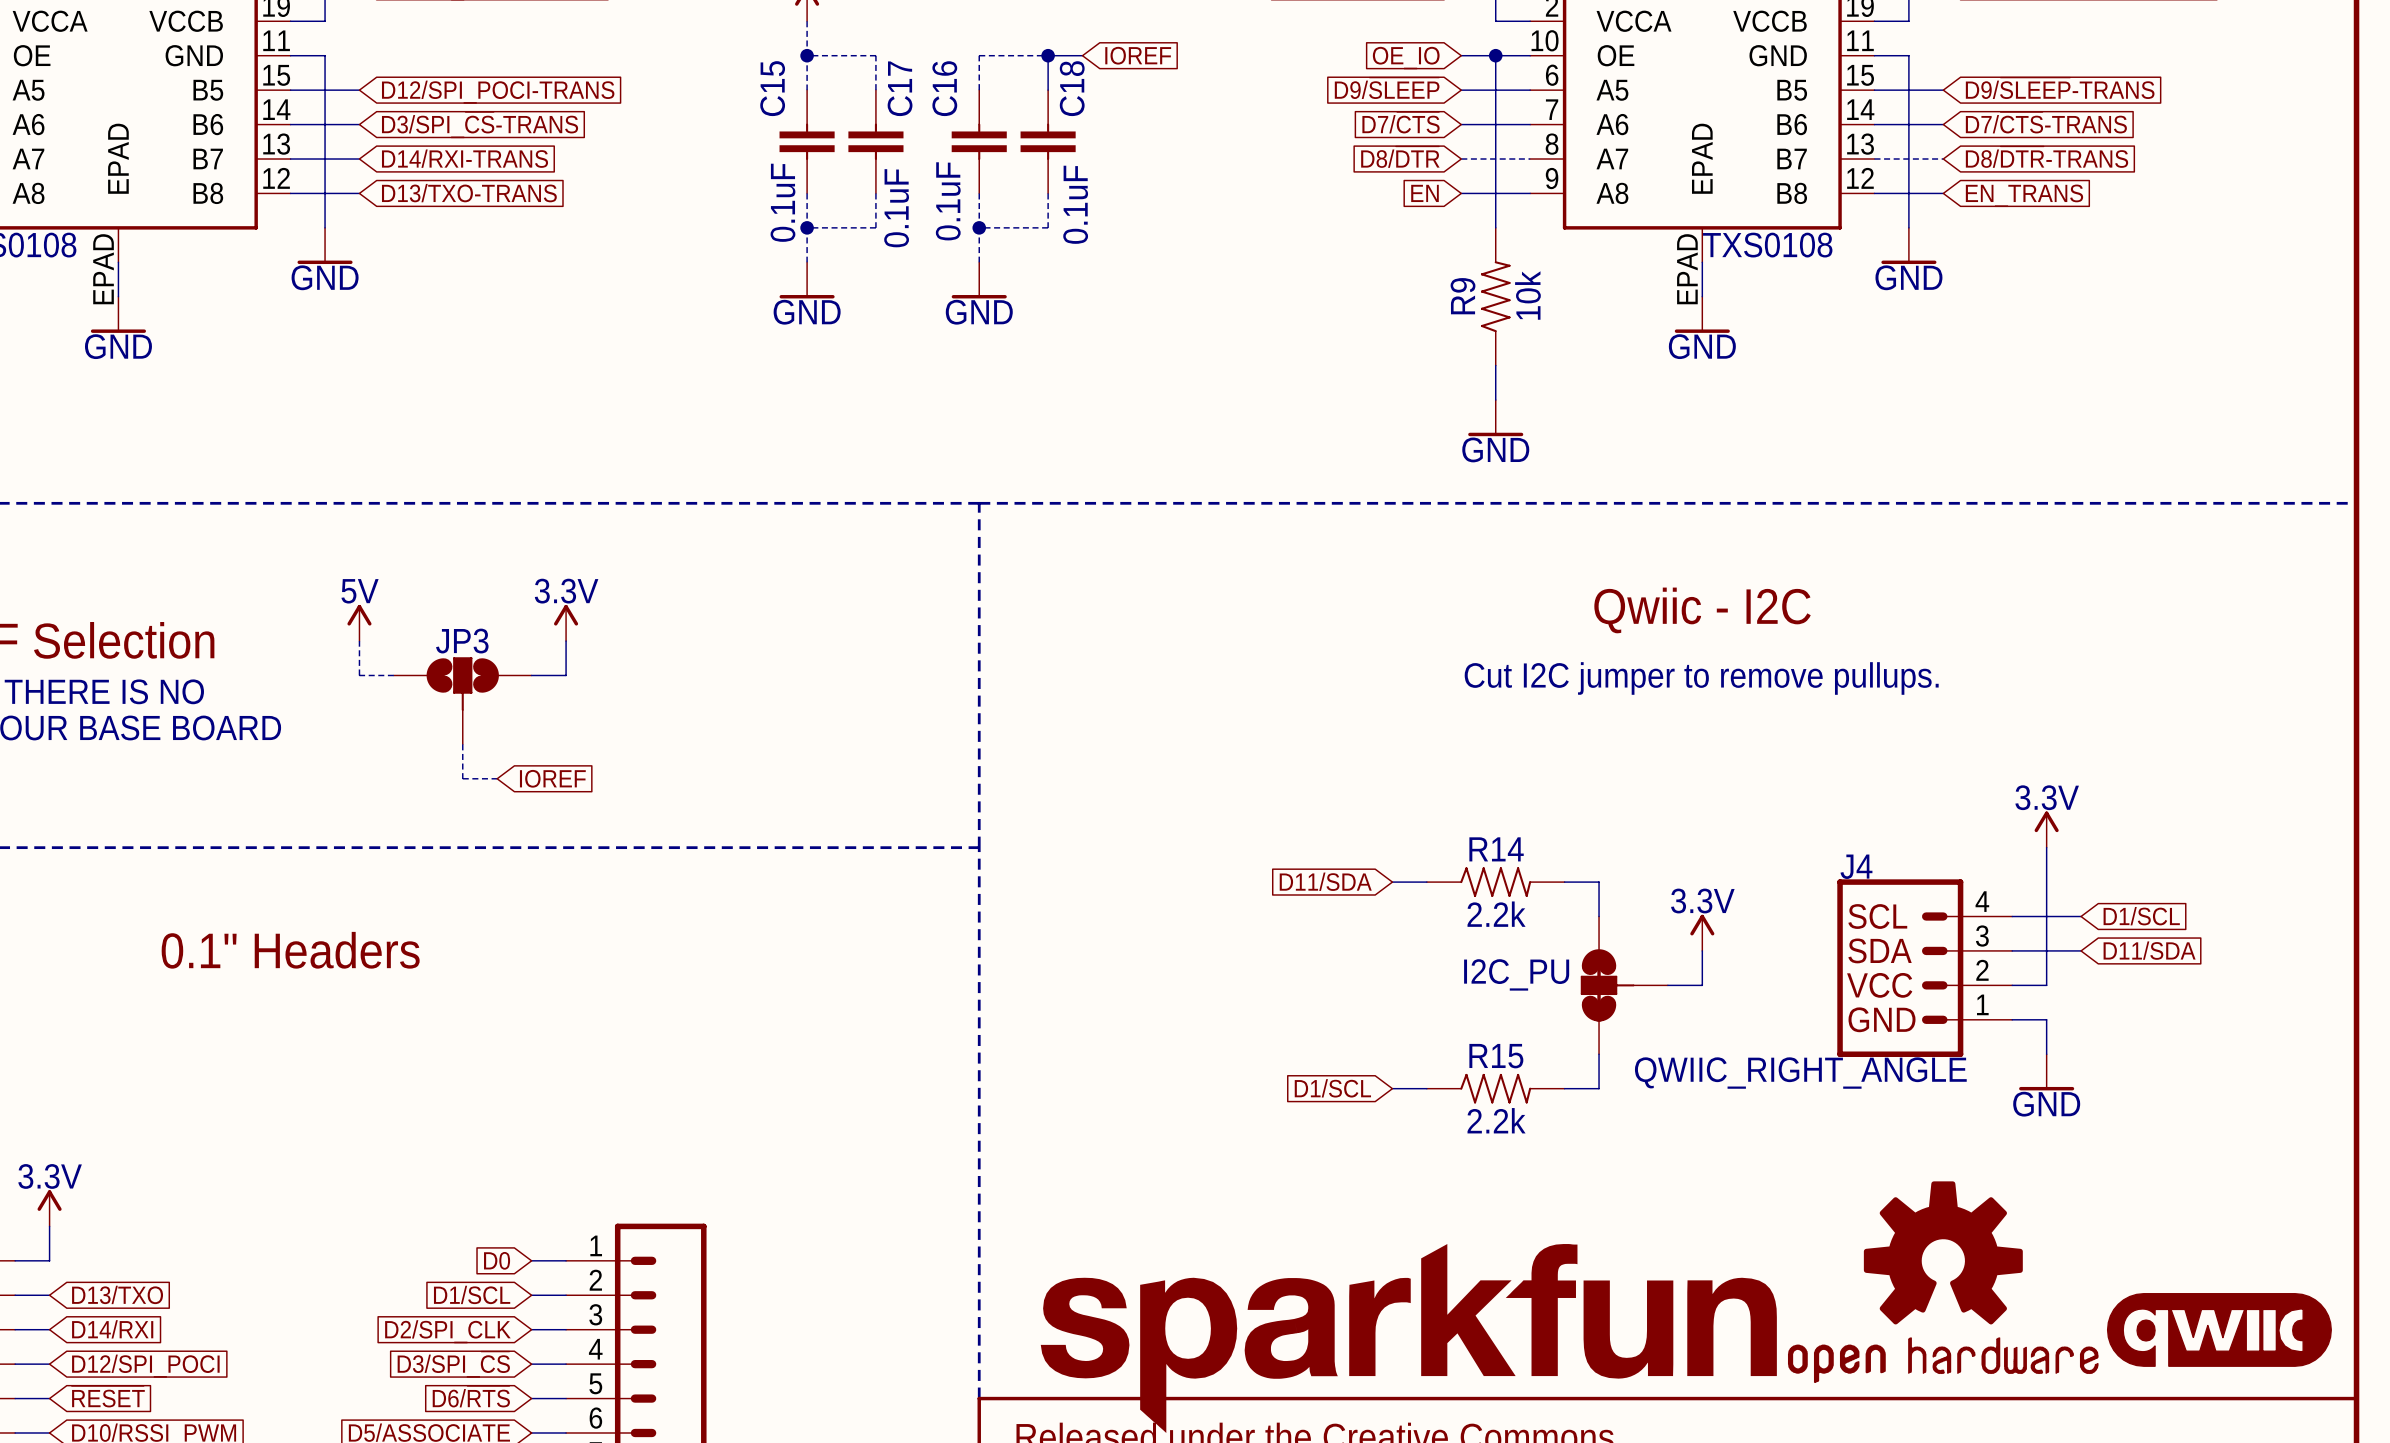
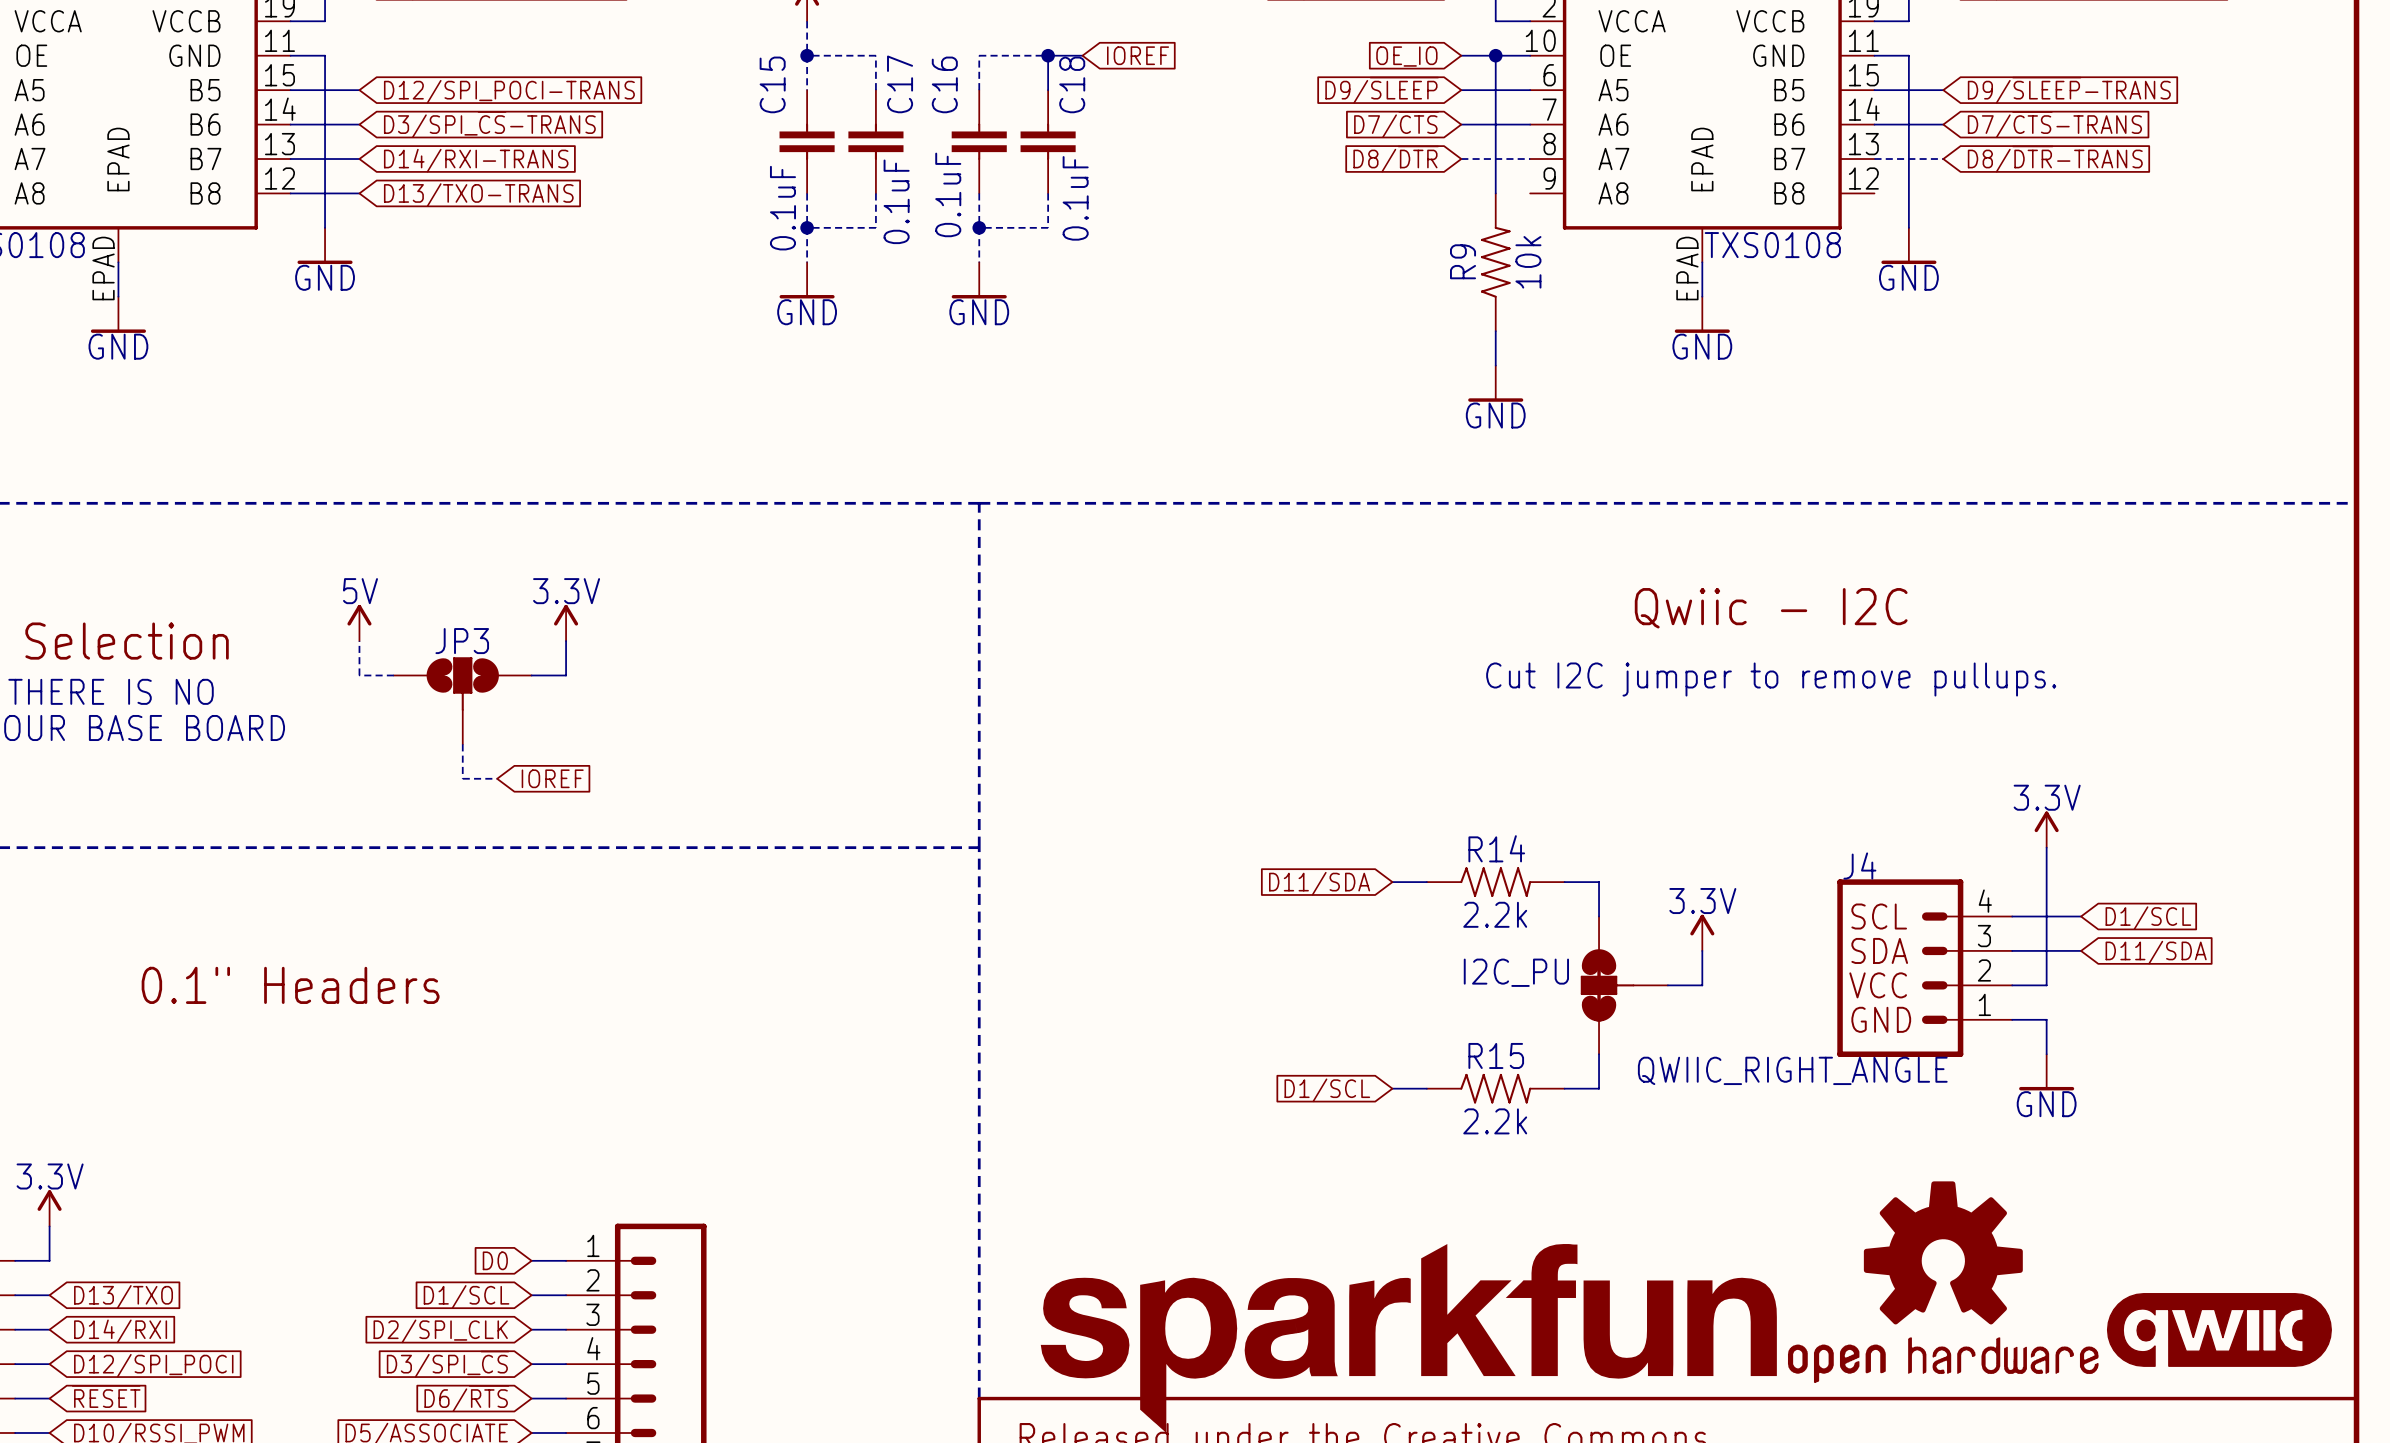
global label: EN (1425, 193) -> none
wire: (1461, 193) (1530, 193) -> none
wire: (1874, 193) (1943, 193) -> none
global label: EN_TRANS (2024, 195) -> none
R9 position: (1495, 296) -> (1495, 262)
power symbol position: GND (1495, 418) -> GND (1495, 383)
text position: Qwiic - I2C (1702, 610) -> Qwiic - I2C (1771, 608)
text position: Cut I2C jumper to remove pullups. (1701, 678) -> Cut I2C jumper to remove pullups. (1771, 679)
text position: 0.1" Headers (290, 950) -> 0.1" Headers (290, 985)

